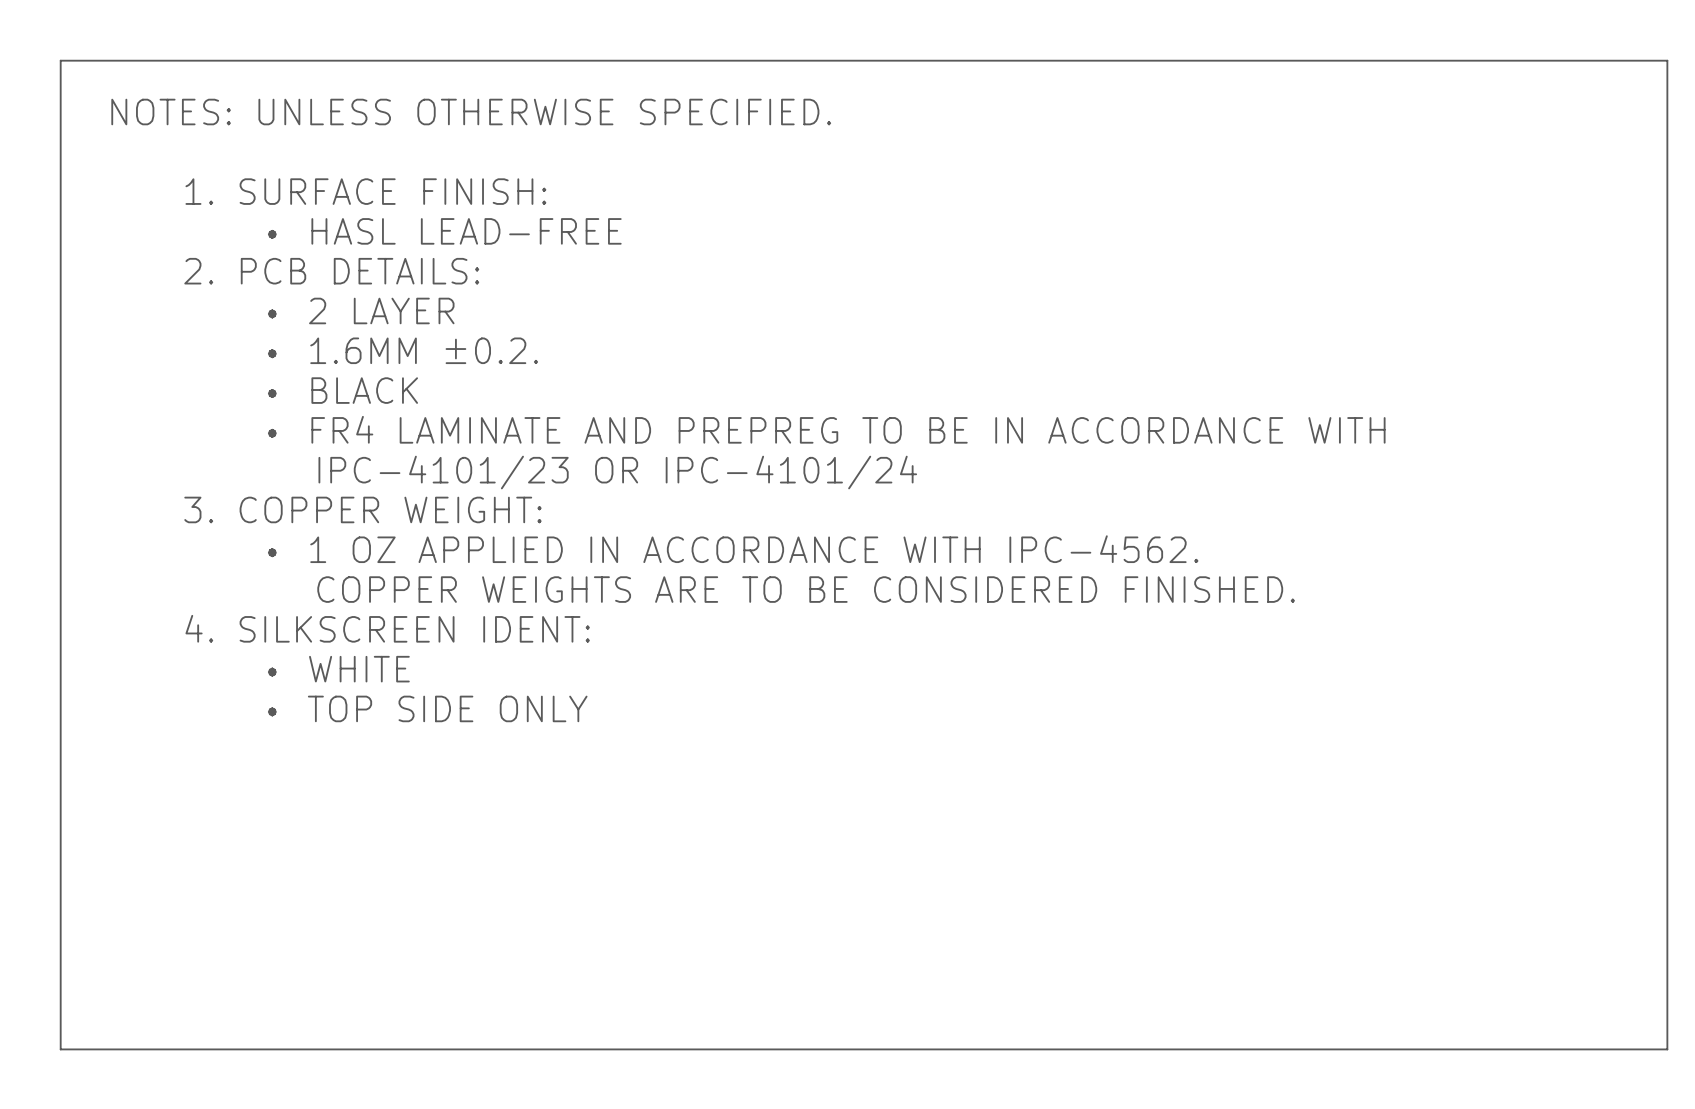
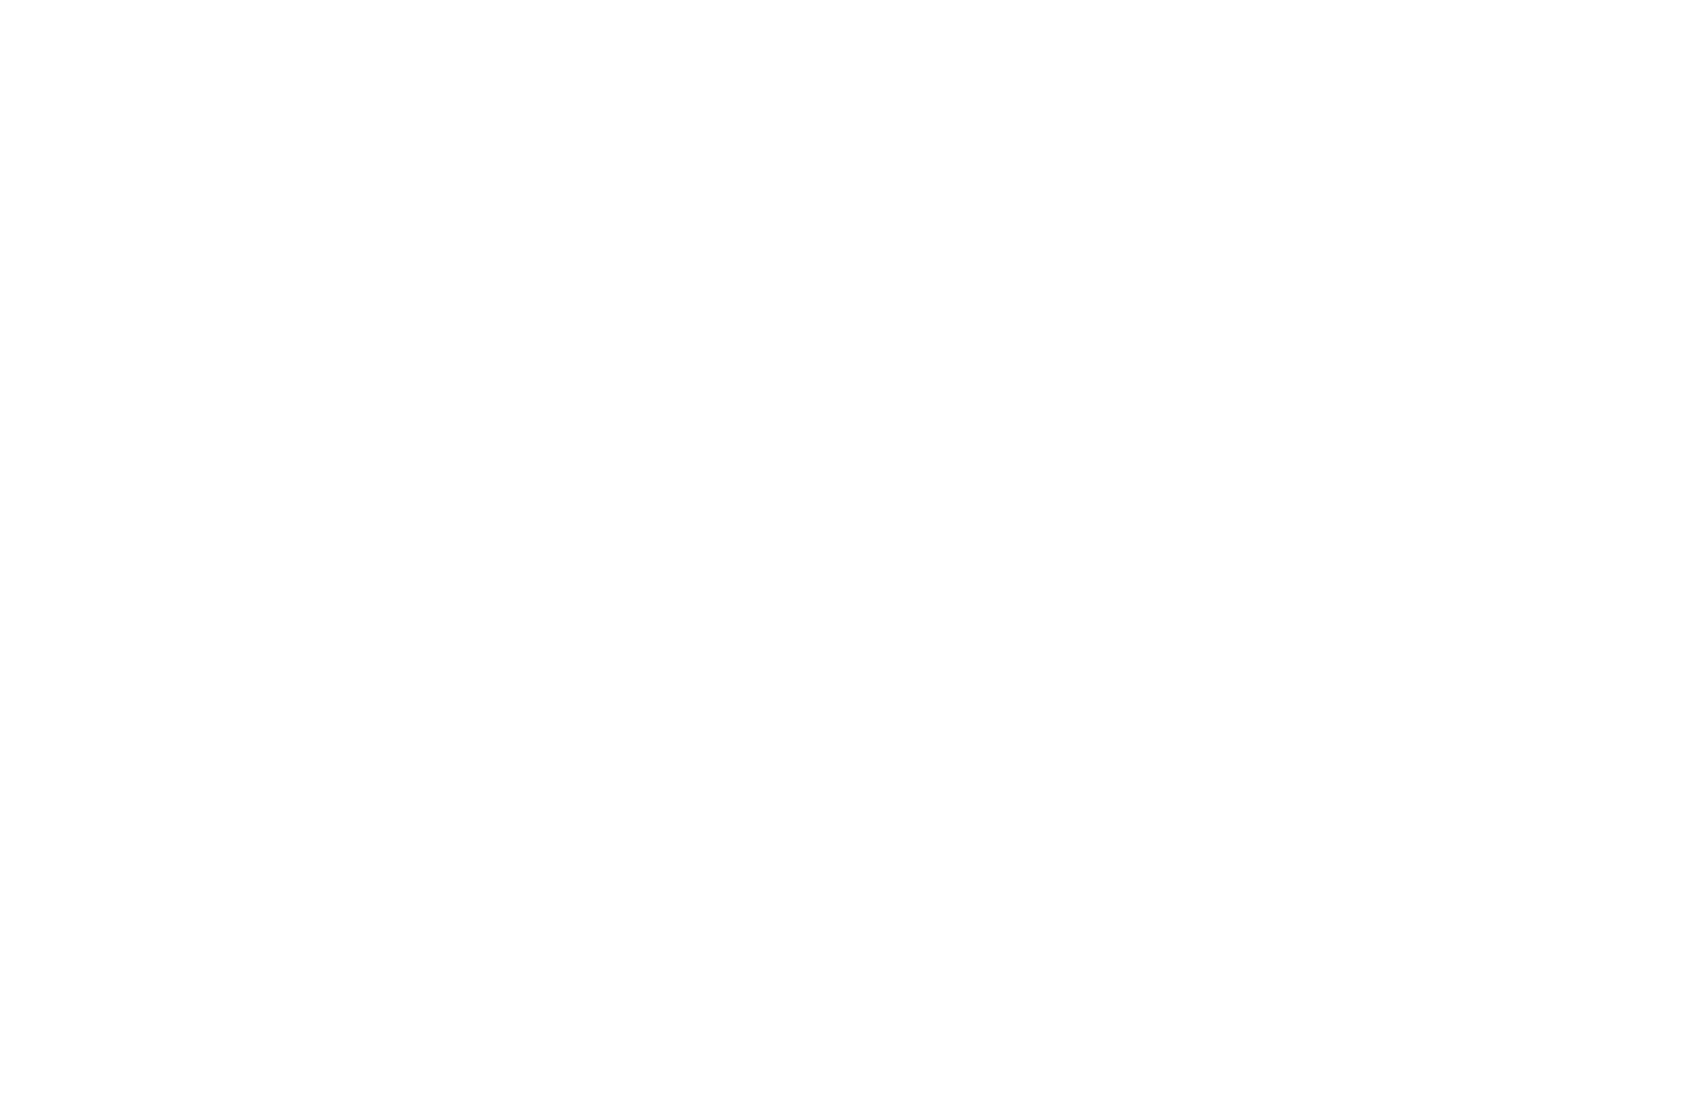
line: (60, 60) (60, 1049) (1667, 1049) (1667, 60) (60, 60) -> none
text: NOTES: UNLESS OTHERWISE SPECIFIED. (471, 112) -> none
text: 1. SURFACE FINISH: (365, 191) -> none
text: • HASL LEAD-FREE (444, 231) -> none
text: 2. PCB DETAILS: (331, 271) -> none
text: • 2 LAYER (361, 310) -> none
text: • 1.6MM ±0.2. (402, 350) -> none
text: • BLACK (342, 390) -> none
text: • FR4 LAMINATE AND PREPREG TO BE IN ACCORDANCE WITH (826, 429) -> none
text: IPC-4101/23 OR IPC-4101/24 (617, 472) -> none
text: 3. COPPER WEIGHT: (362, 509) -> none
text: • 1 OZ APPLIED IN ACCORDANCE WITH IPC-4562. (733, 549) -> none
text: COPPER WEIGHTS ARE TO BE CONSIDERED FINISHED. (806, 589) -> none
text: 4. SILKSCREEN IDENT: (387, 628) -> none
text: • WHITE (338, 669) -> none
text: • TOP SIDE ONLY (427, 708) -> none

